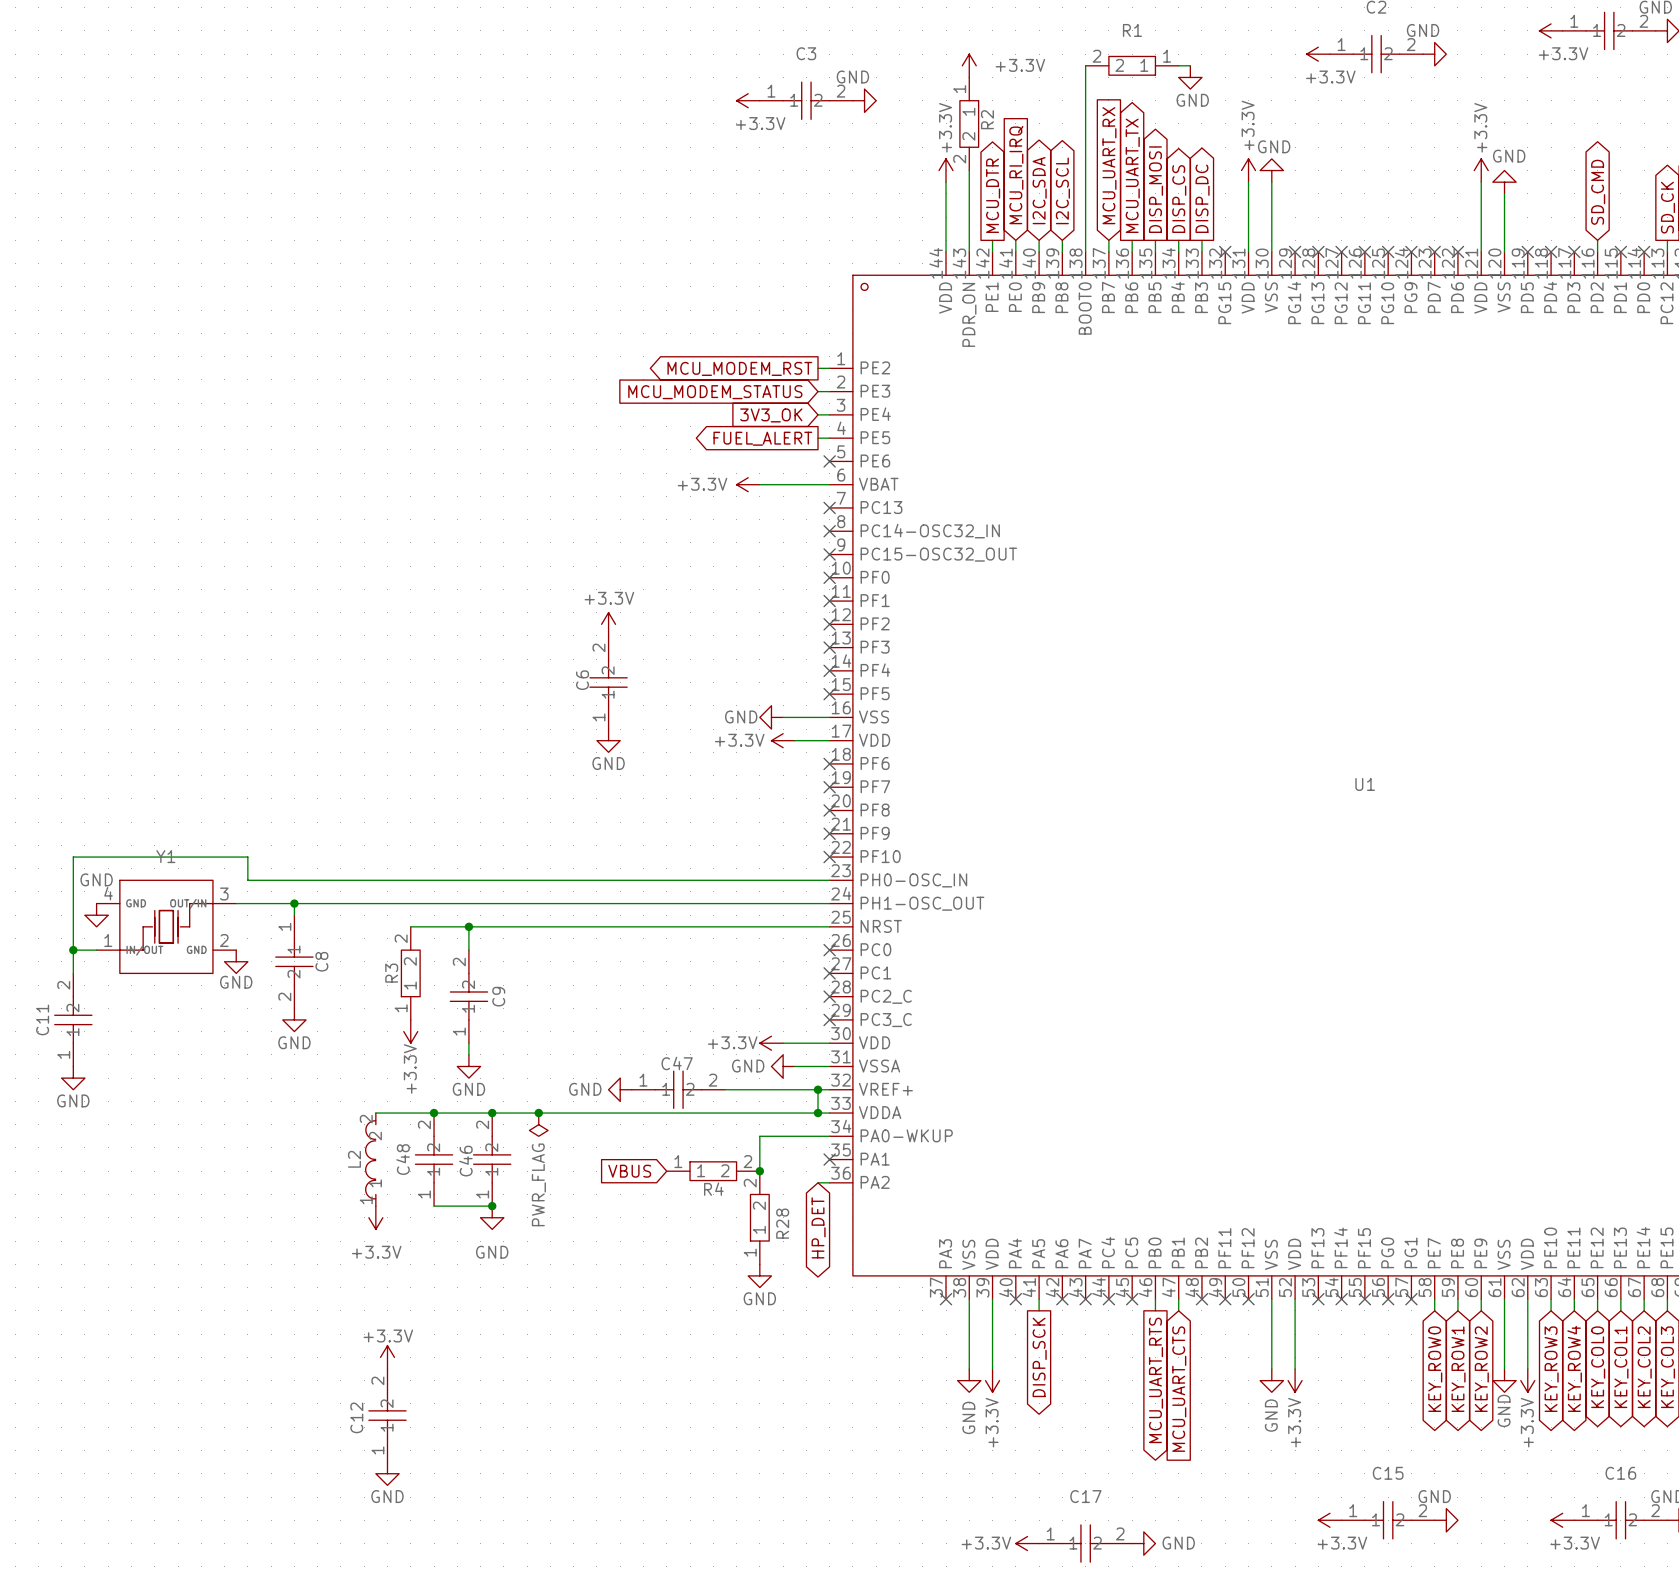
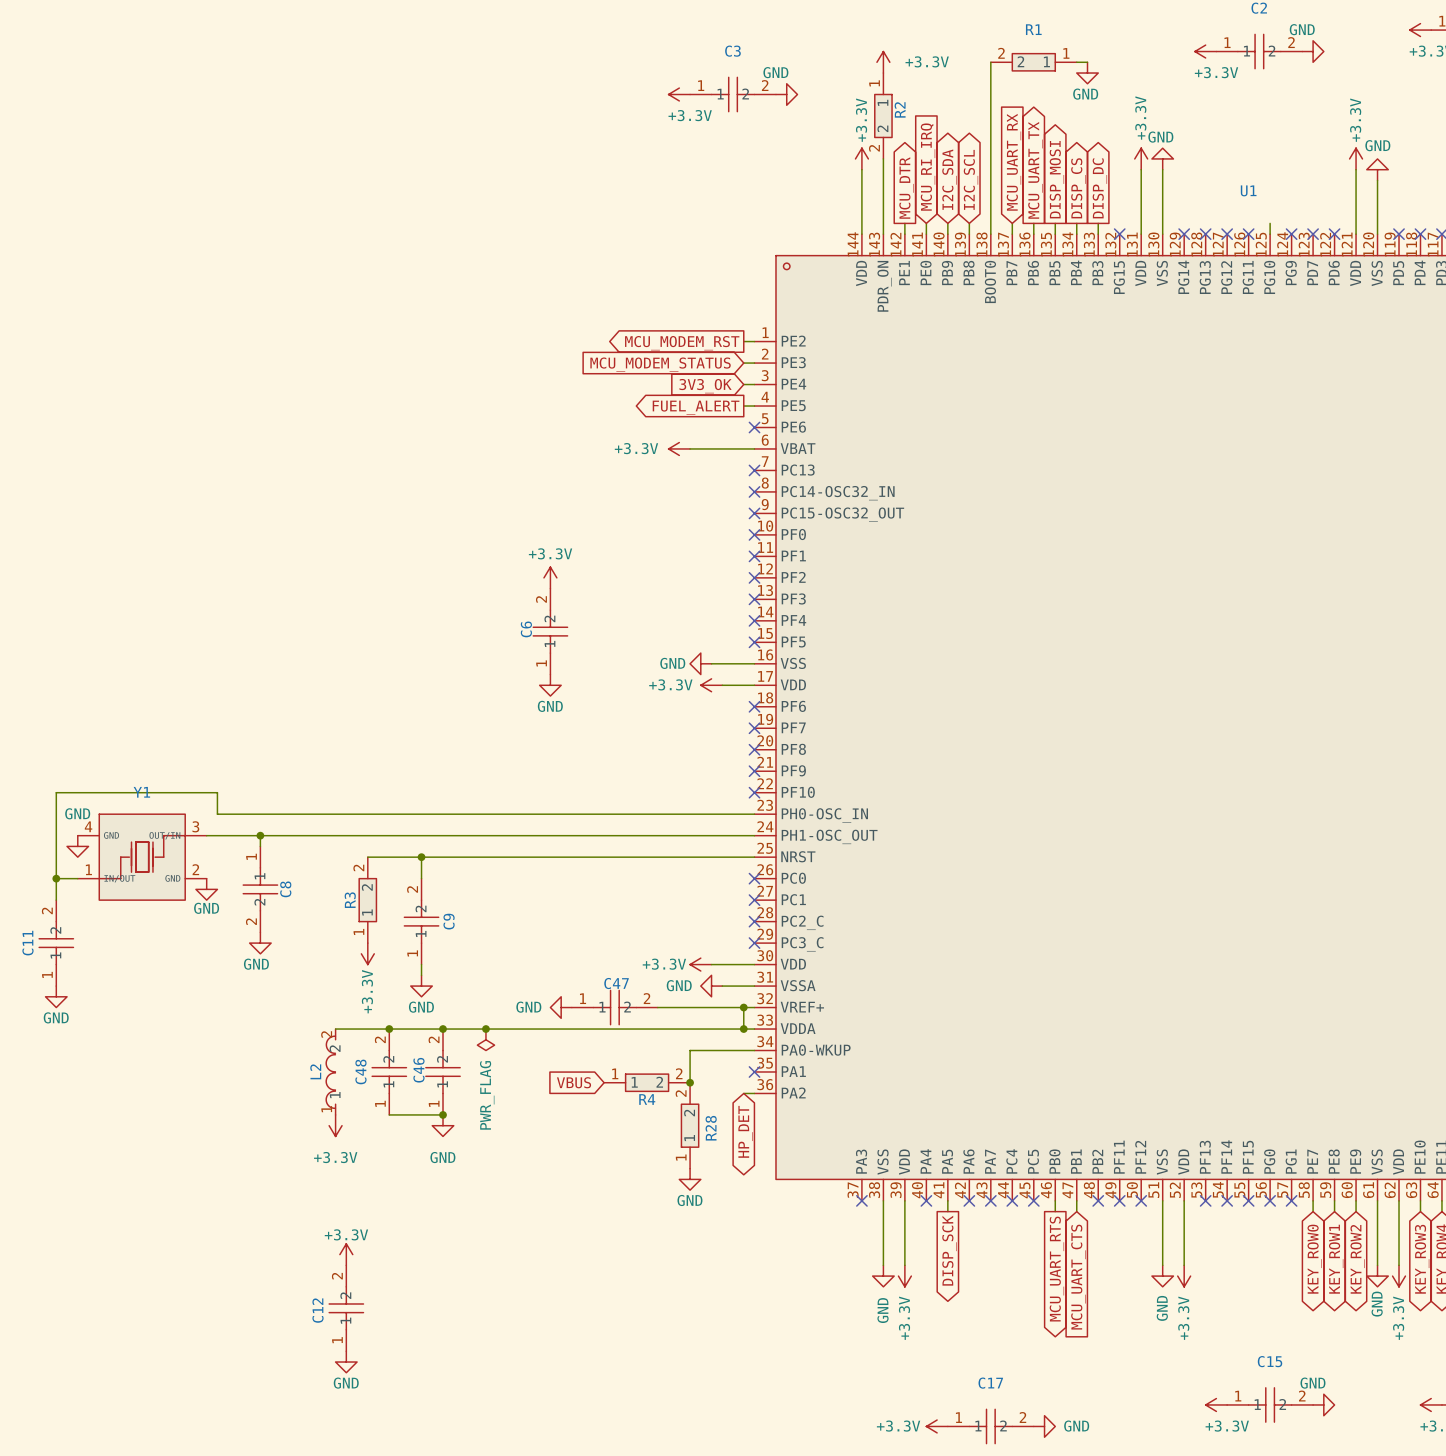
wire: none -> (1270, 223) (1270, 234)
no-connect mark: (1388, 251) -> none
U1 name position: U1 (1365, 784) -> U1 (1248, 190)

